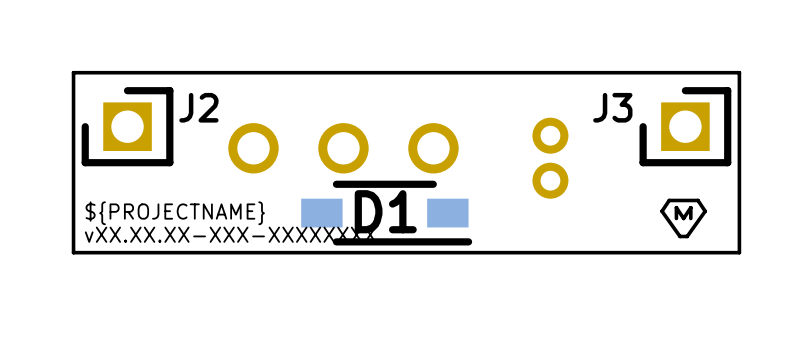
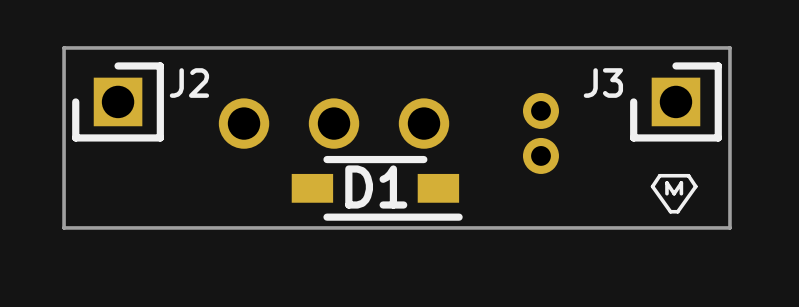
text: ${PROJECTNAME} (175, 213) -> none
text: vXX.XX.XX-XXX-XXXXXXXX (230, 234) -> none

